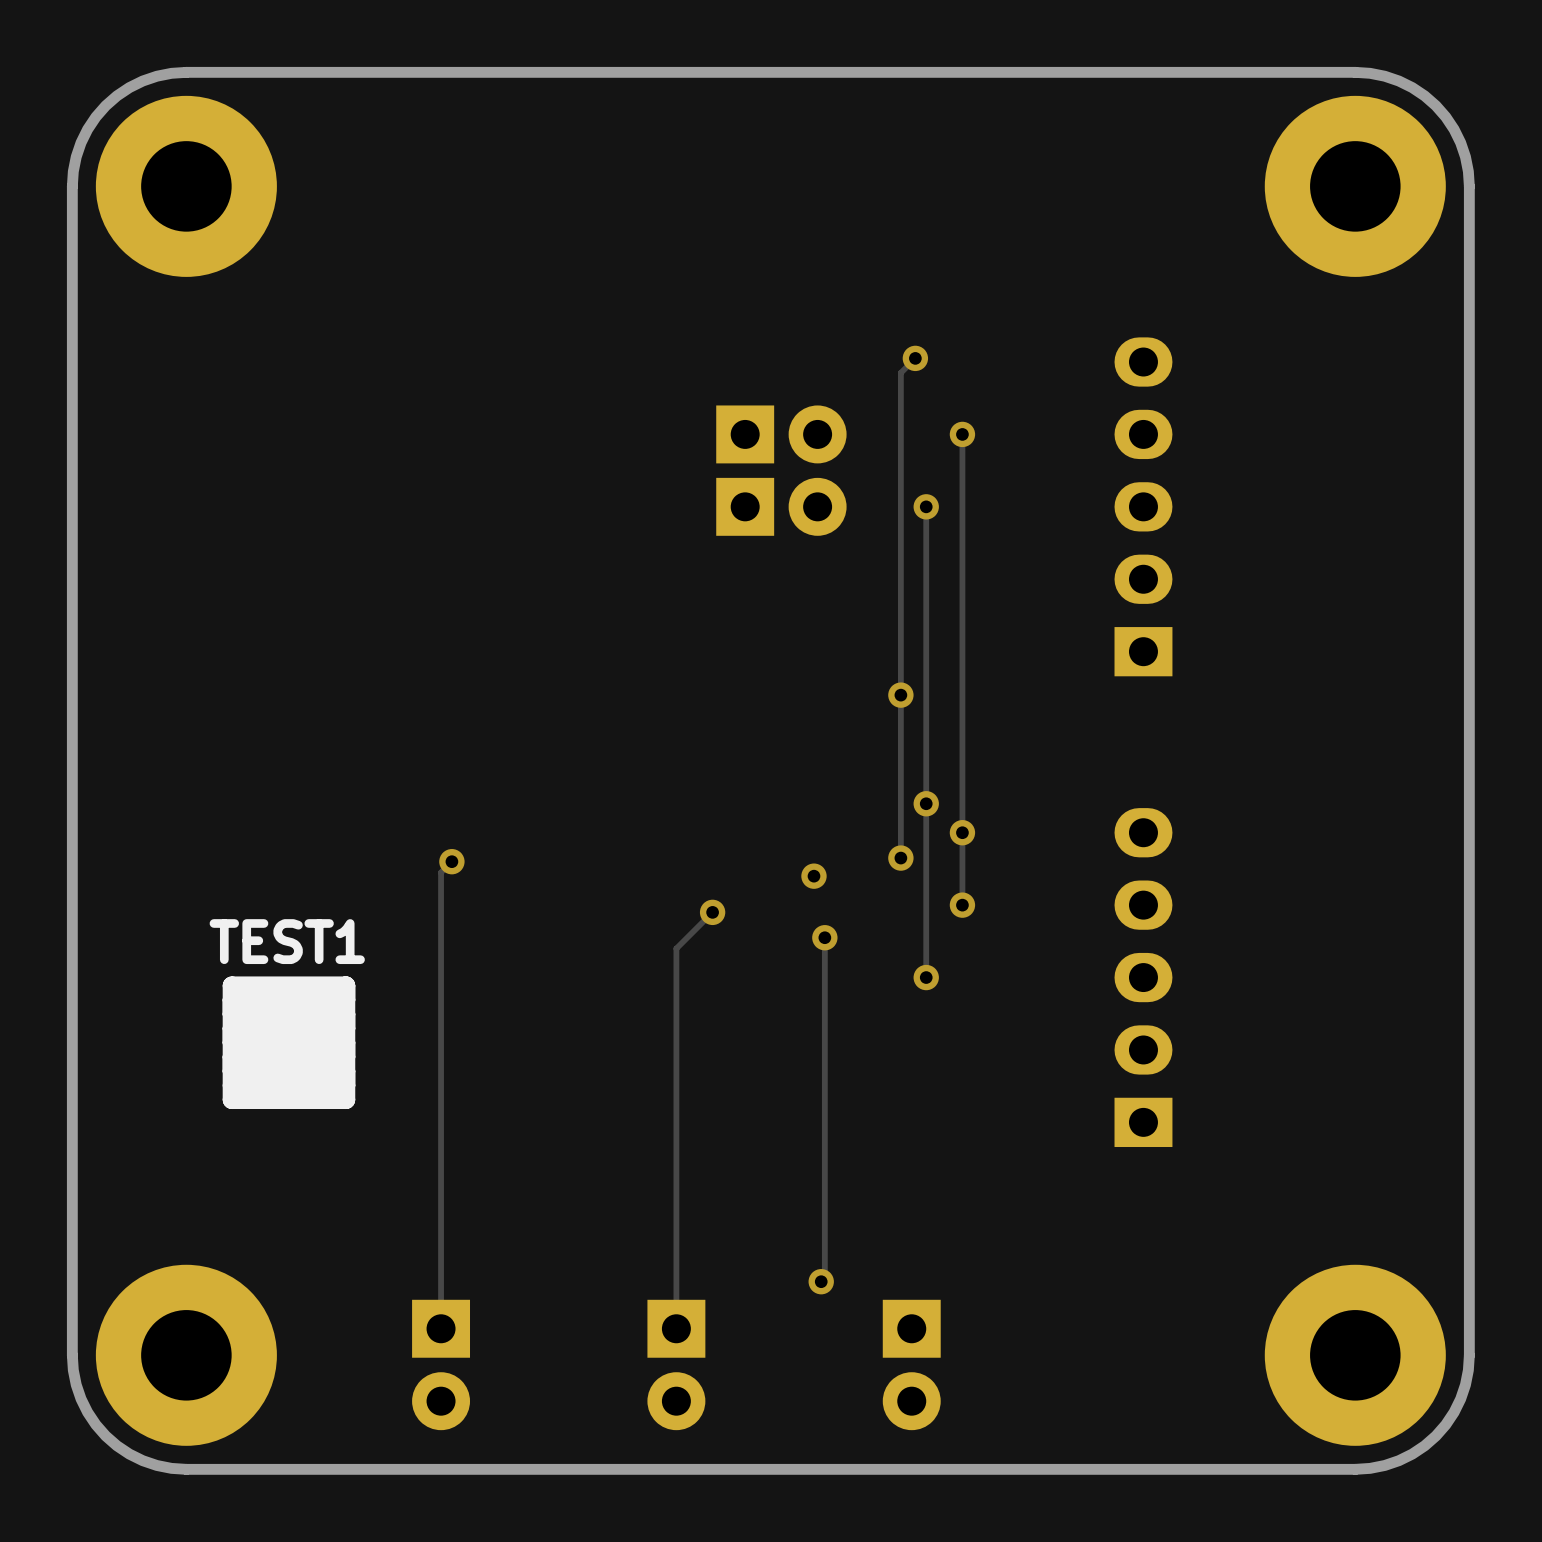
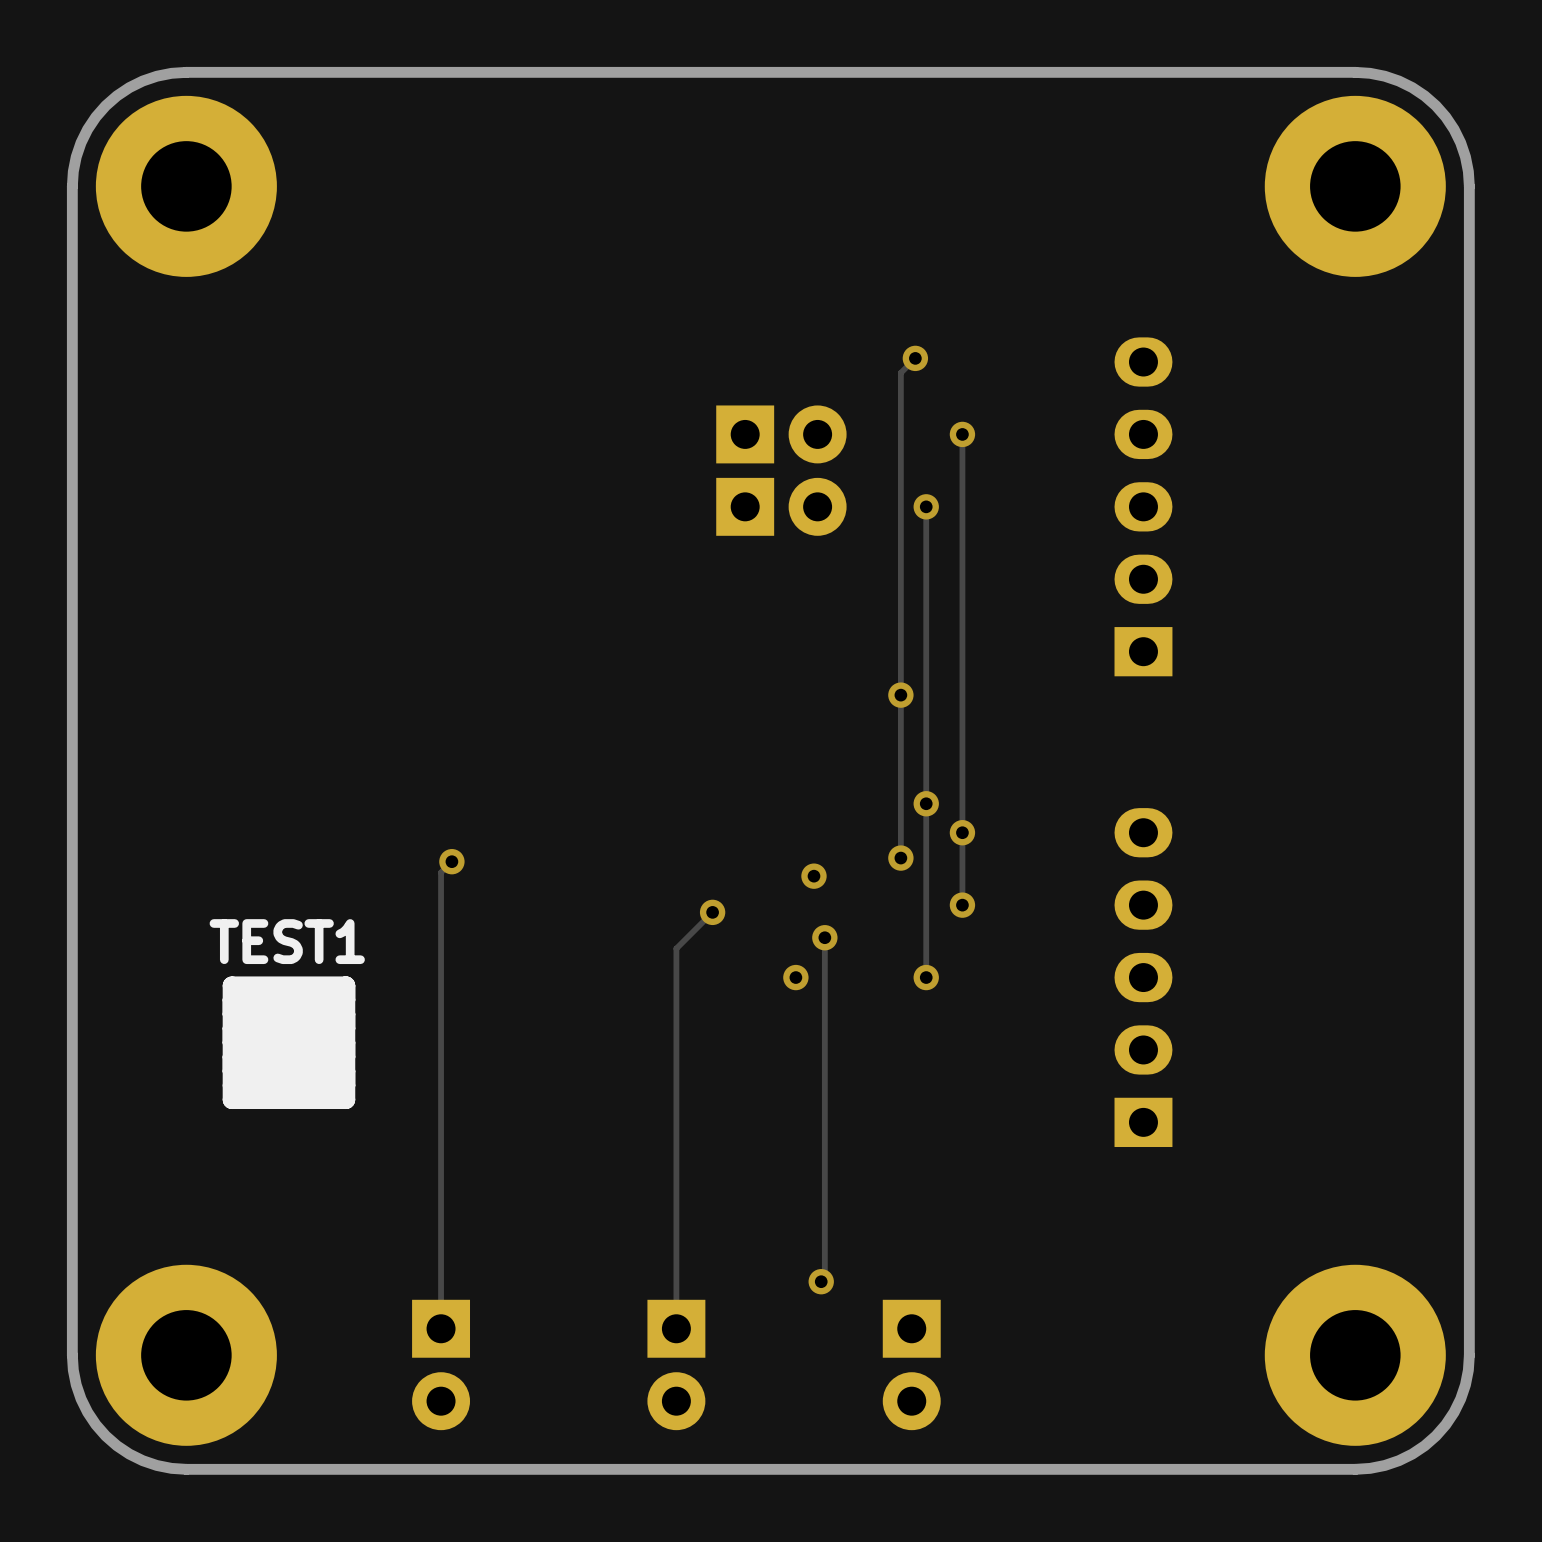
via: none -> (795, 977)

